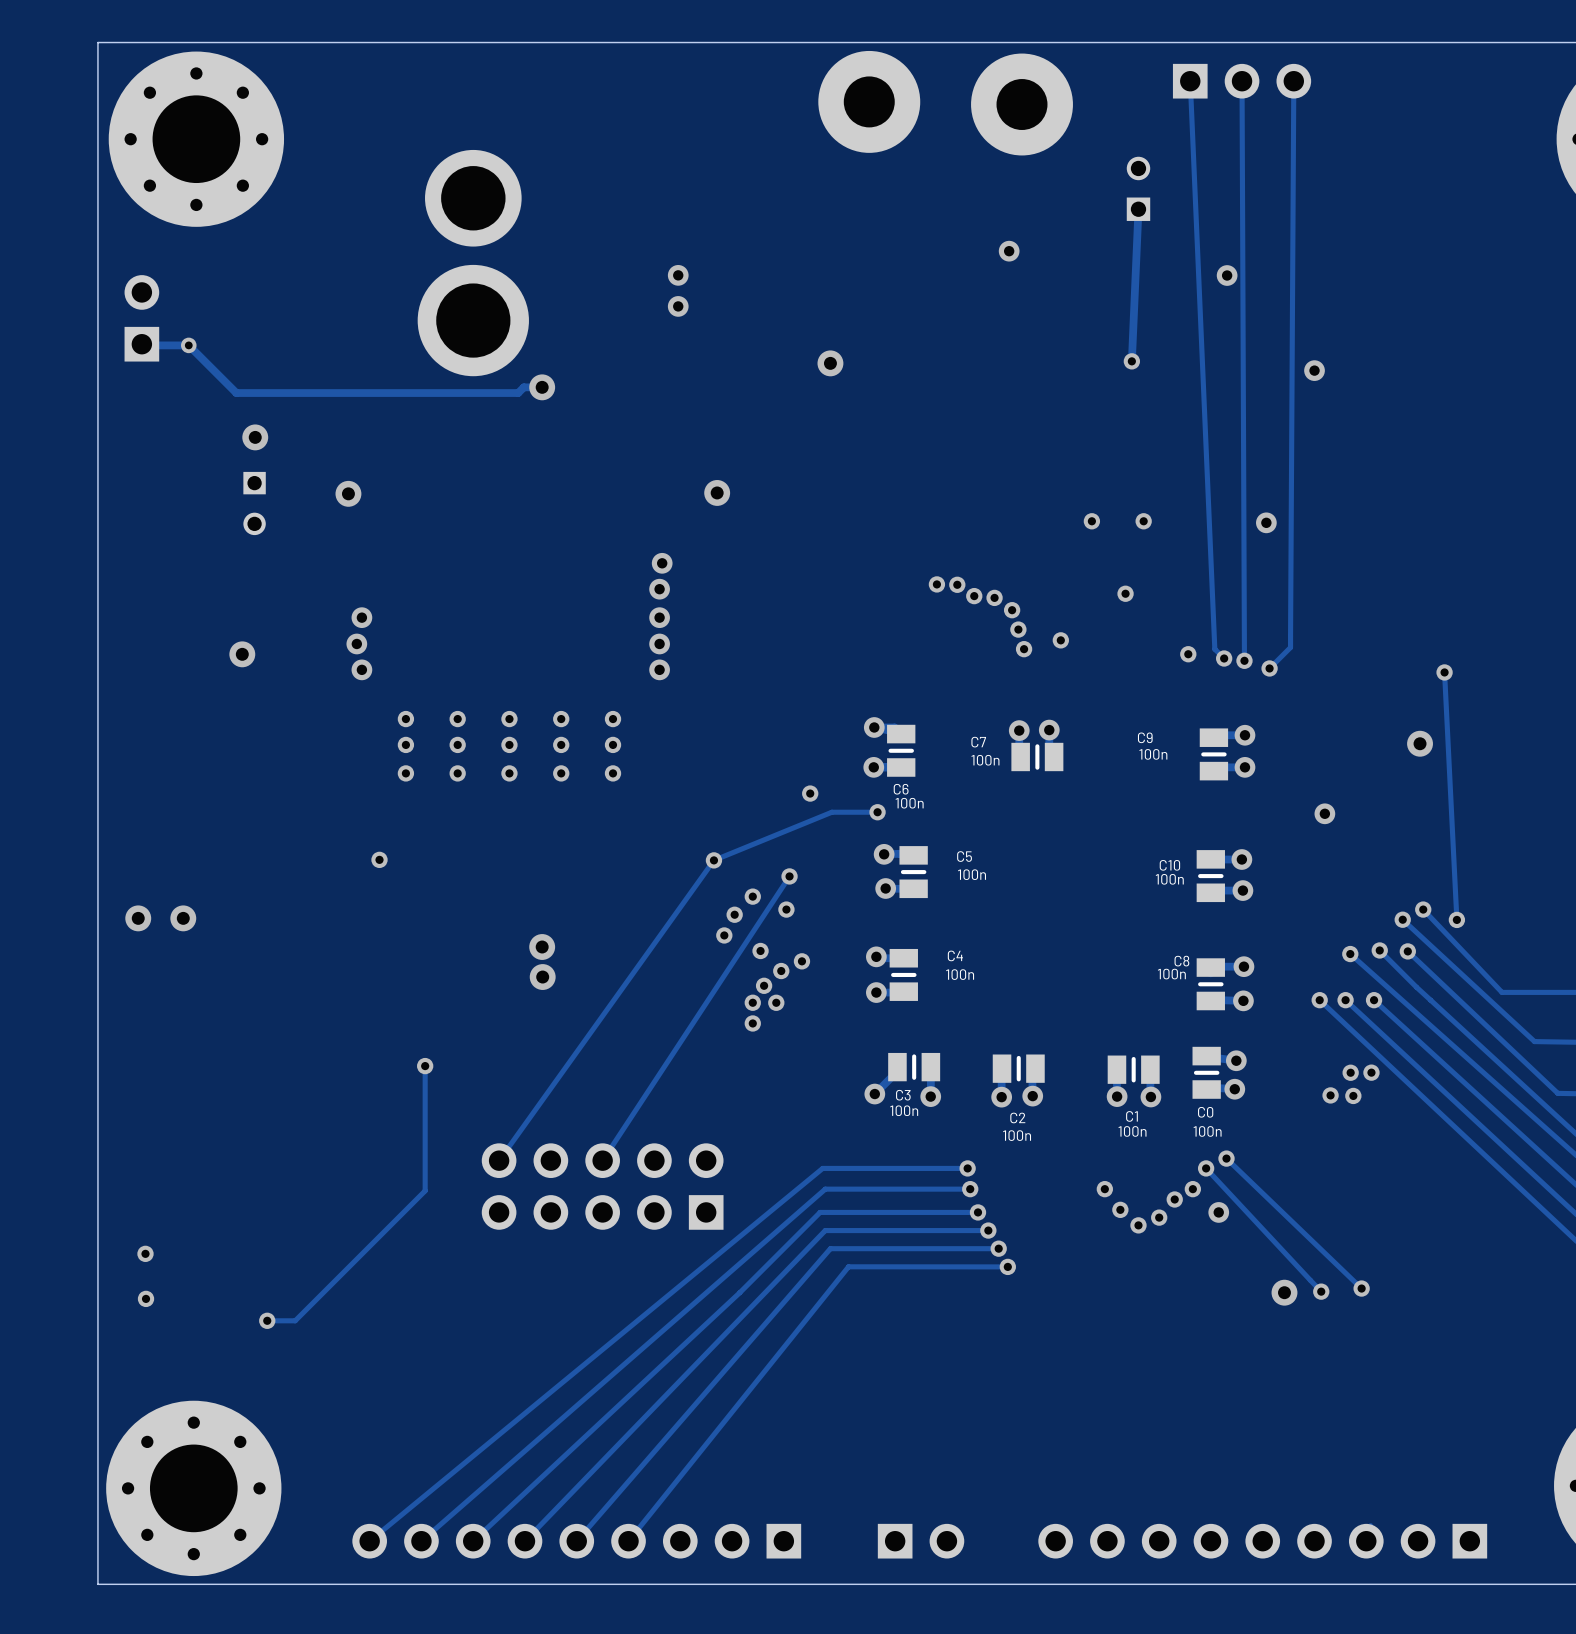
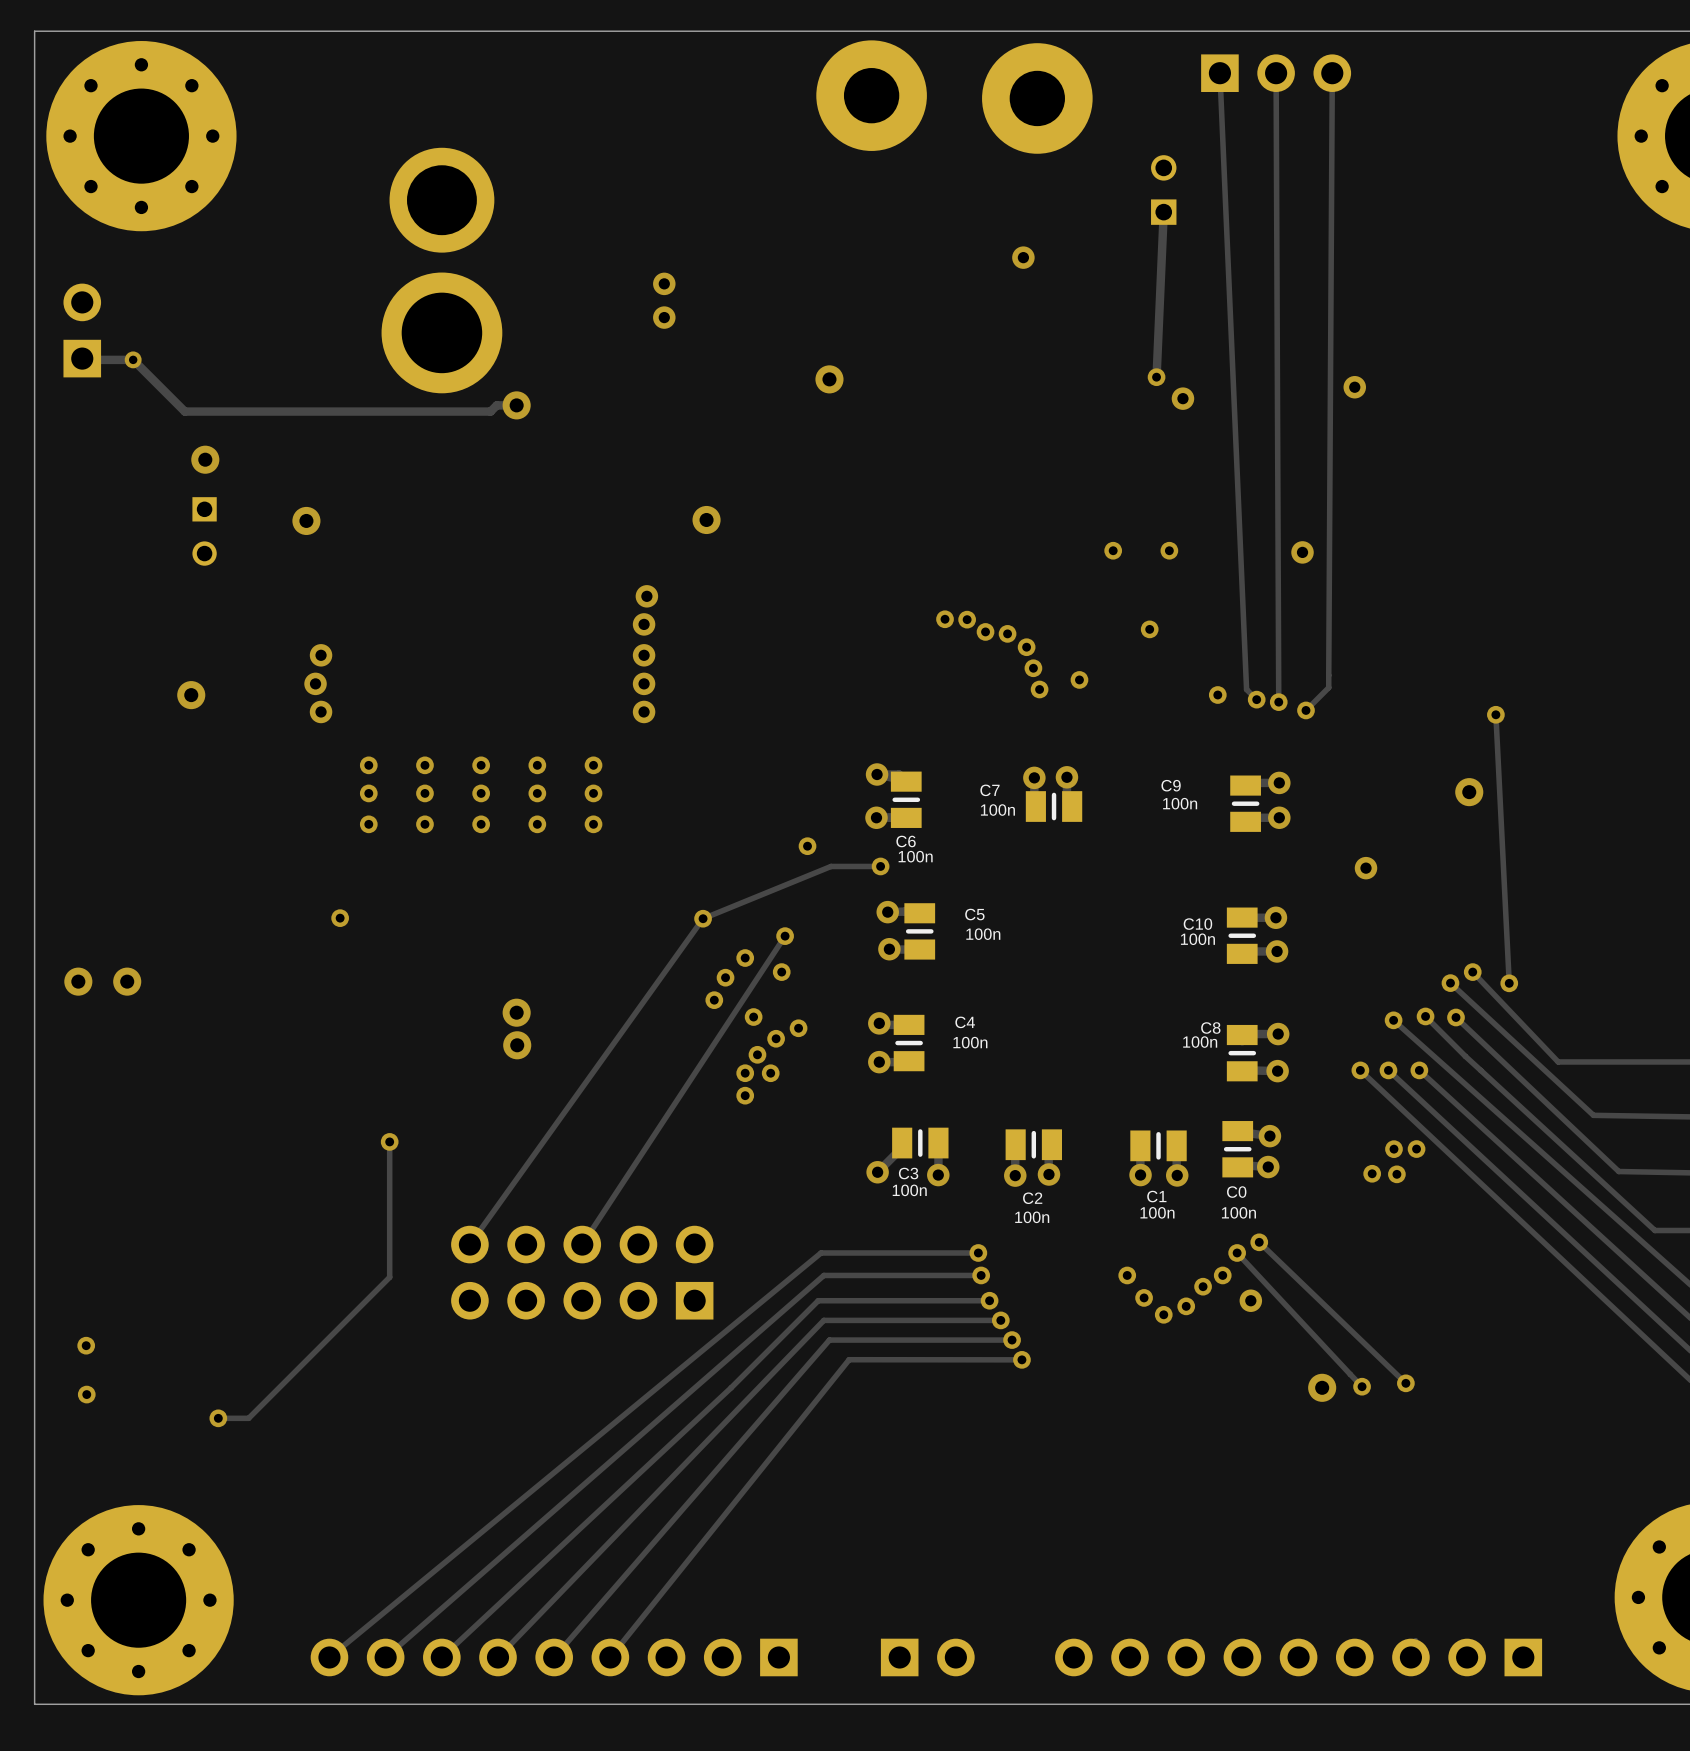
via: (1227, 275) -> none
via: none -> (1182, 398)

